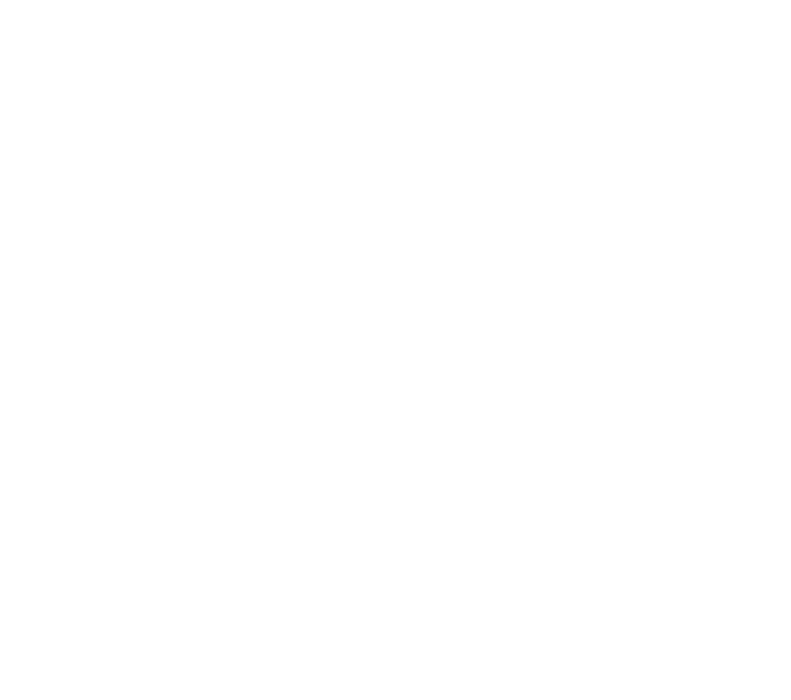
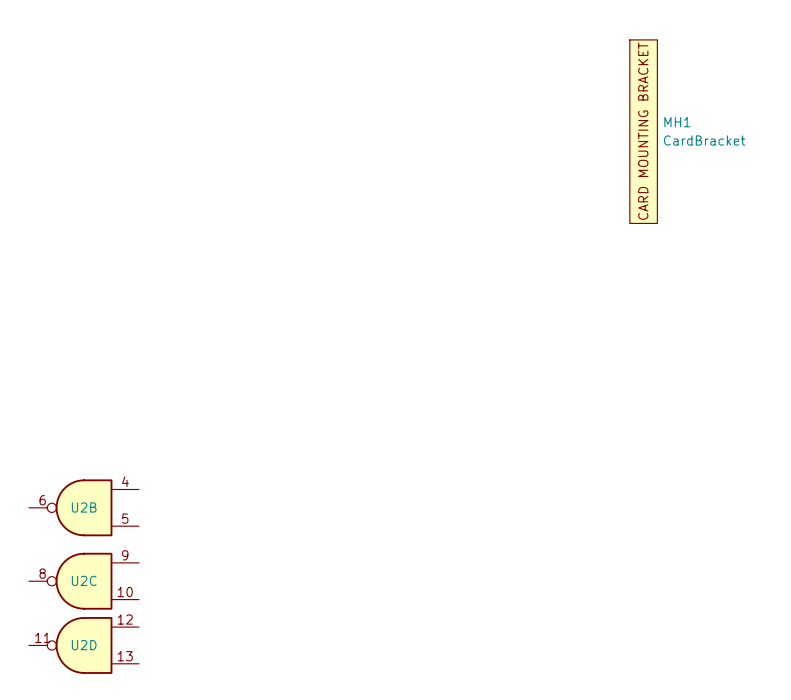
MH1: none -> CardBracket (643, 131)
U2B: none -> (83, 507)
U2C: none -> (83, 581)
U2D: none -> (83, 645)

